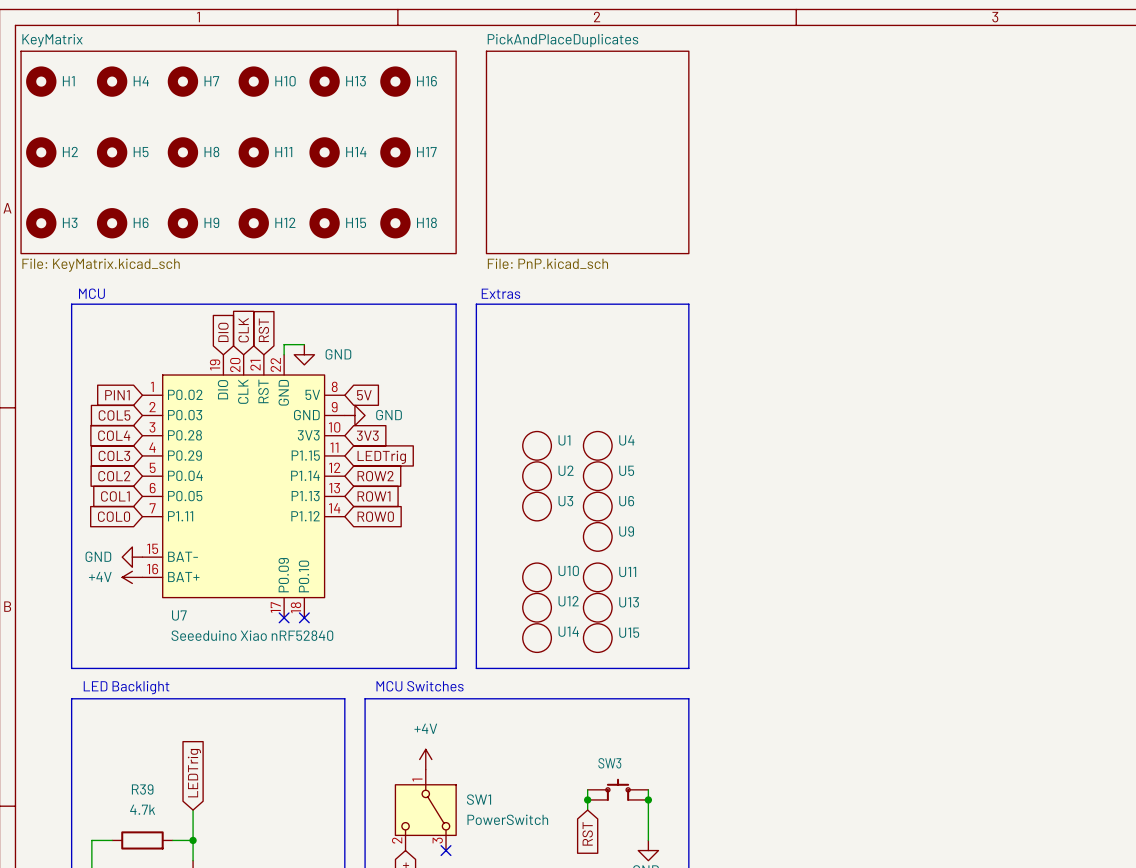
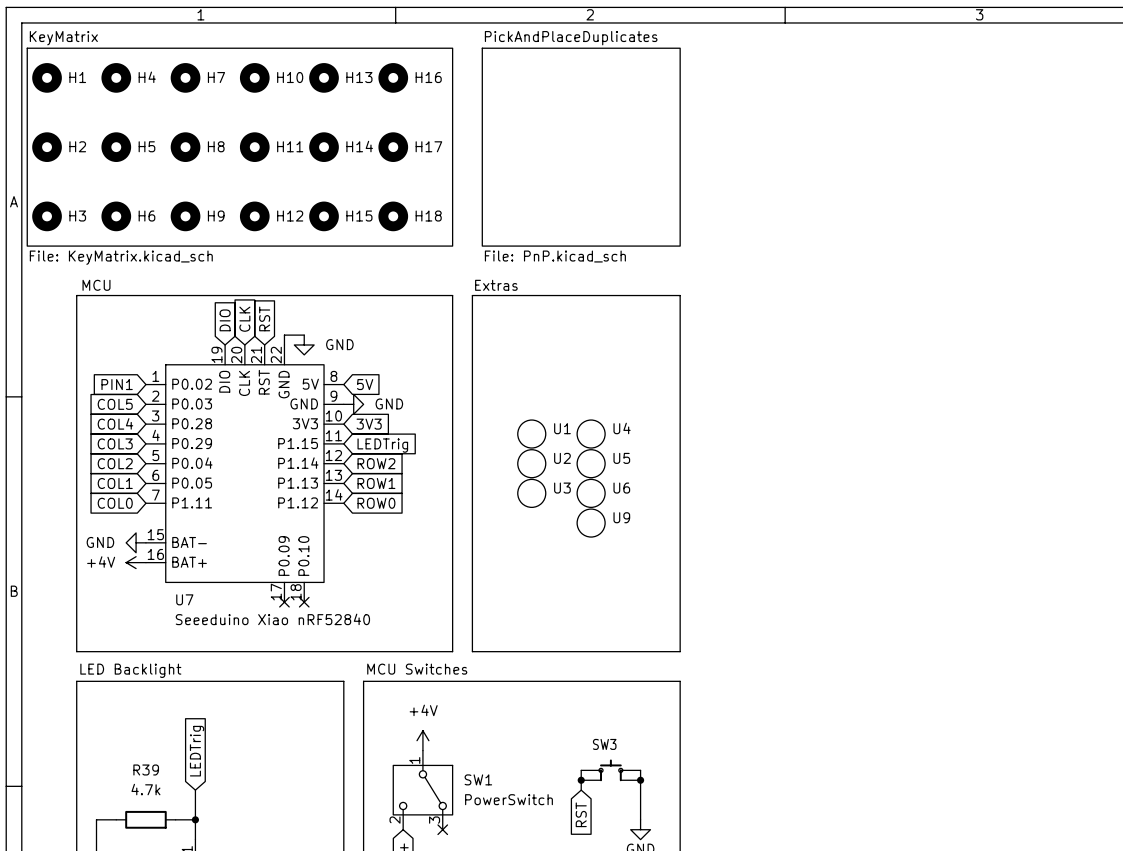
U10: (537, 577) -> none
U11: (597, 577) -> none
U12: (537, 607) -> none
U13: (597, 607) -> none
U14: (537, 638) -> none
U15: (597, 638) -> none

